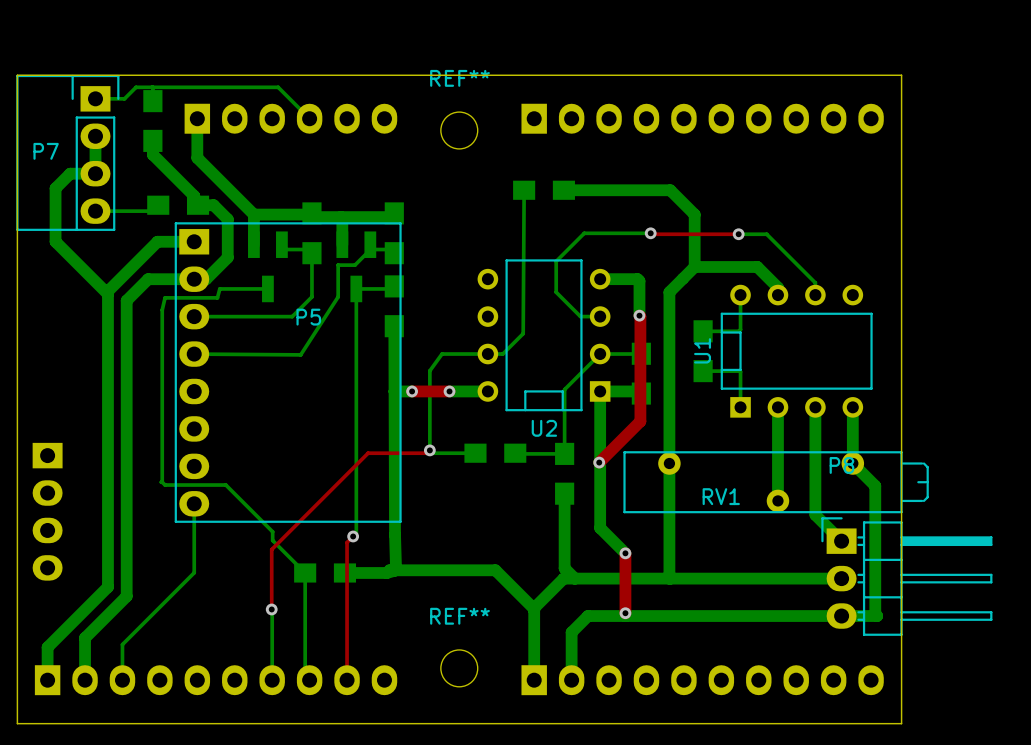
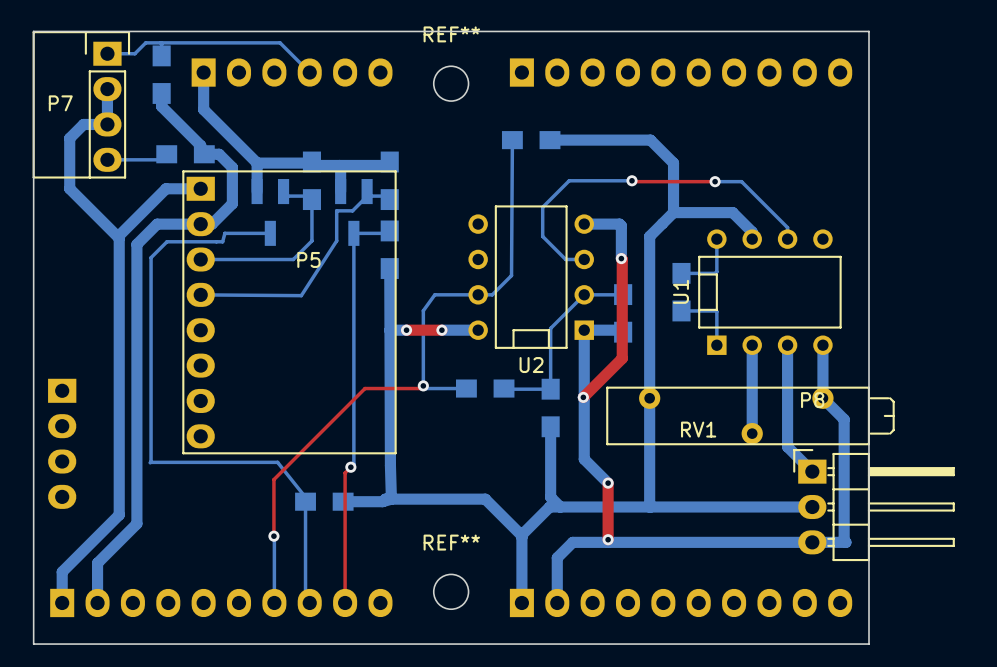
bottom track: (165, 297) (162, 310) (161, 482) (165, 485) (225, 485) (272, 531) (272, 540) (305, 572) -> (173, 241) (166, 241) (151, 257) (150, 462)
bottom track: (194, 503) (194, 572) (122, 644) (122, 680) -> none
bottom track: none -> (150, 462) (277, 462) (309, 501)

